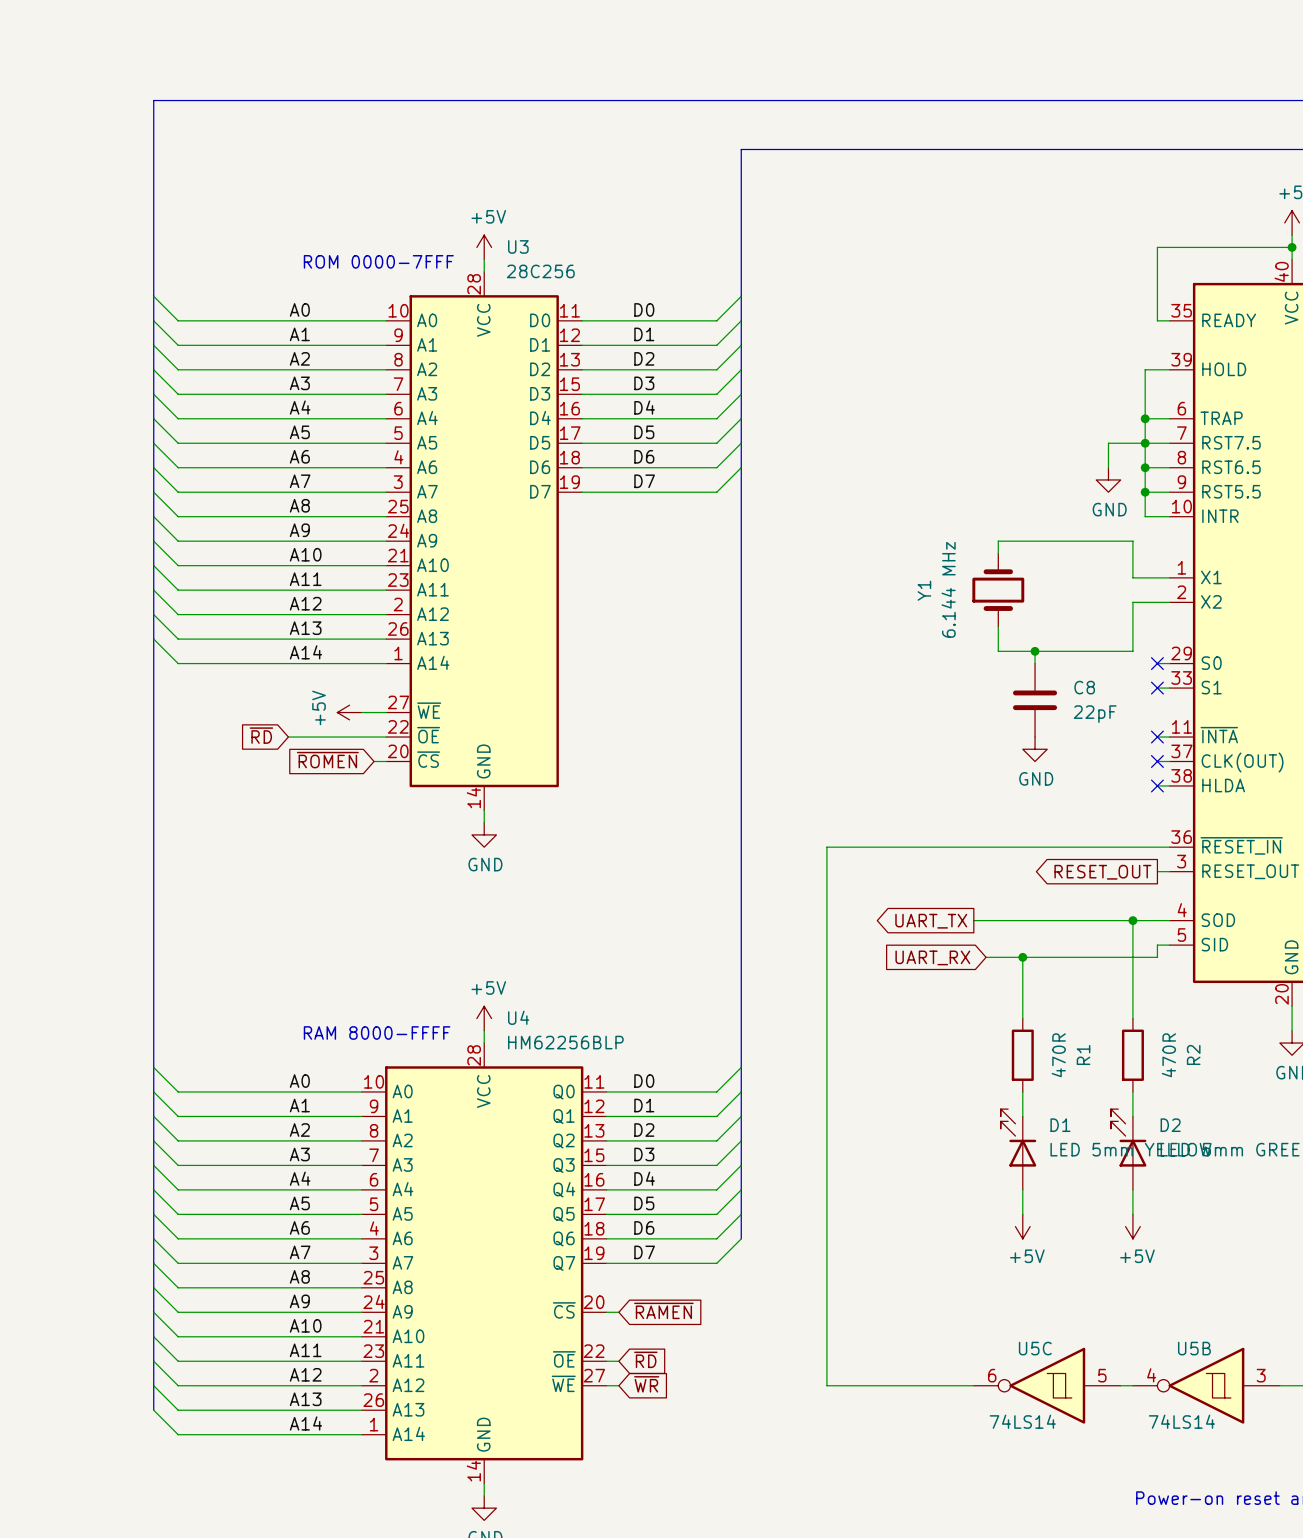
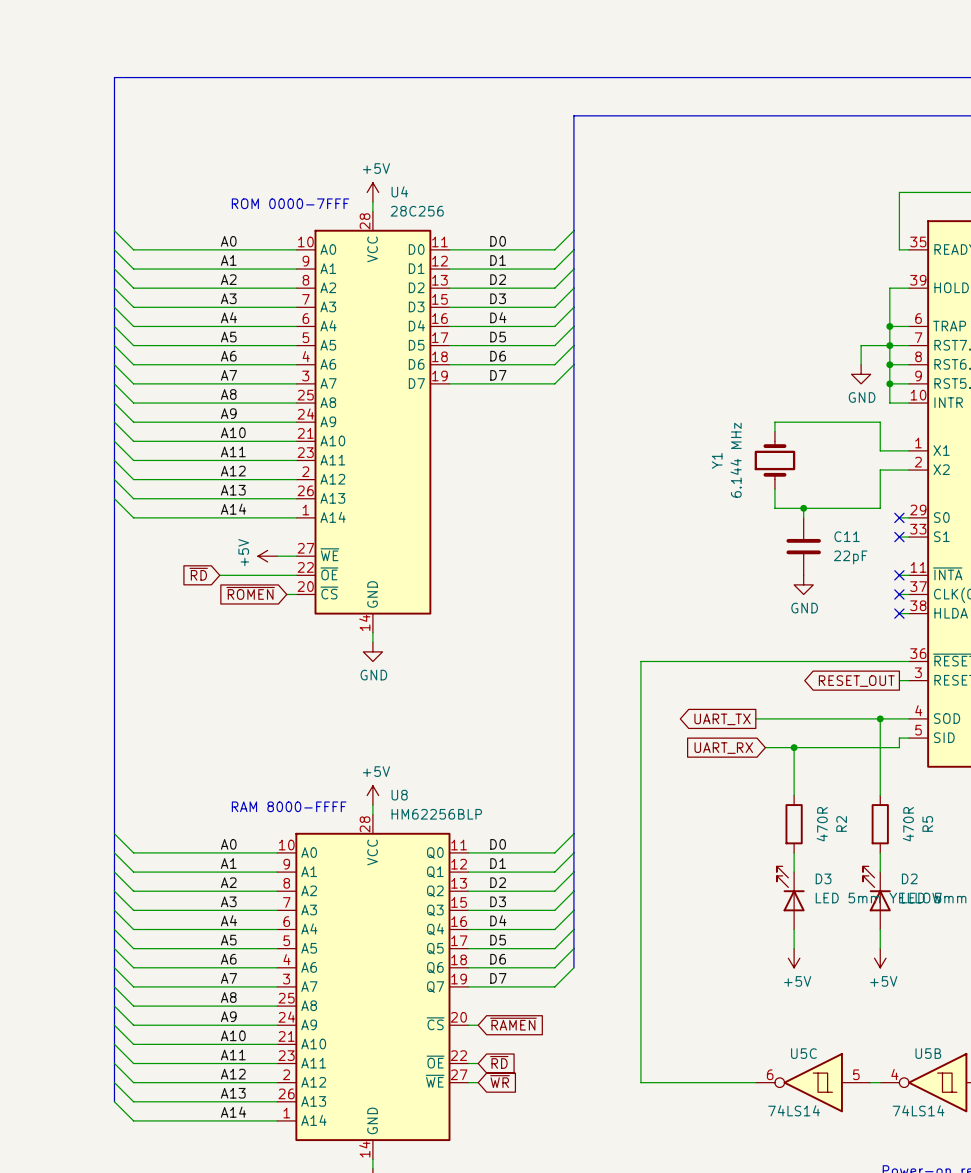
U3 name: U3 (518, 246) -> U4 (399, 191)
C8 name: C8 (1084, 687) -> C11 (847, 536)
U4 name: U4 (518, 1017) -> U8 (399, 795)
R1 name: R1 (1083, 1054) -> R2 (841, 823)
R2 name: R2 (1193, 1054) -> R5 (927, 823)
D1 name: D1 (1060, 1125) -> D3 (823, 878)

